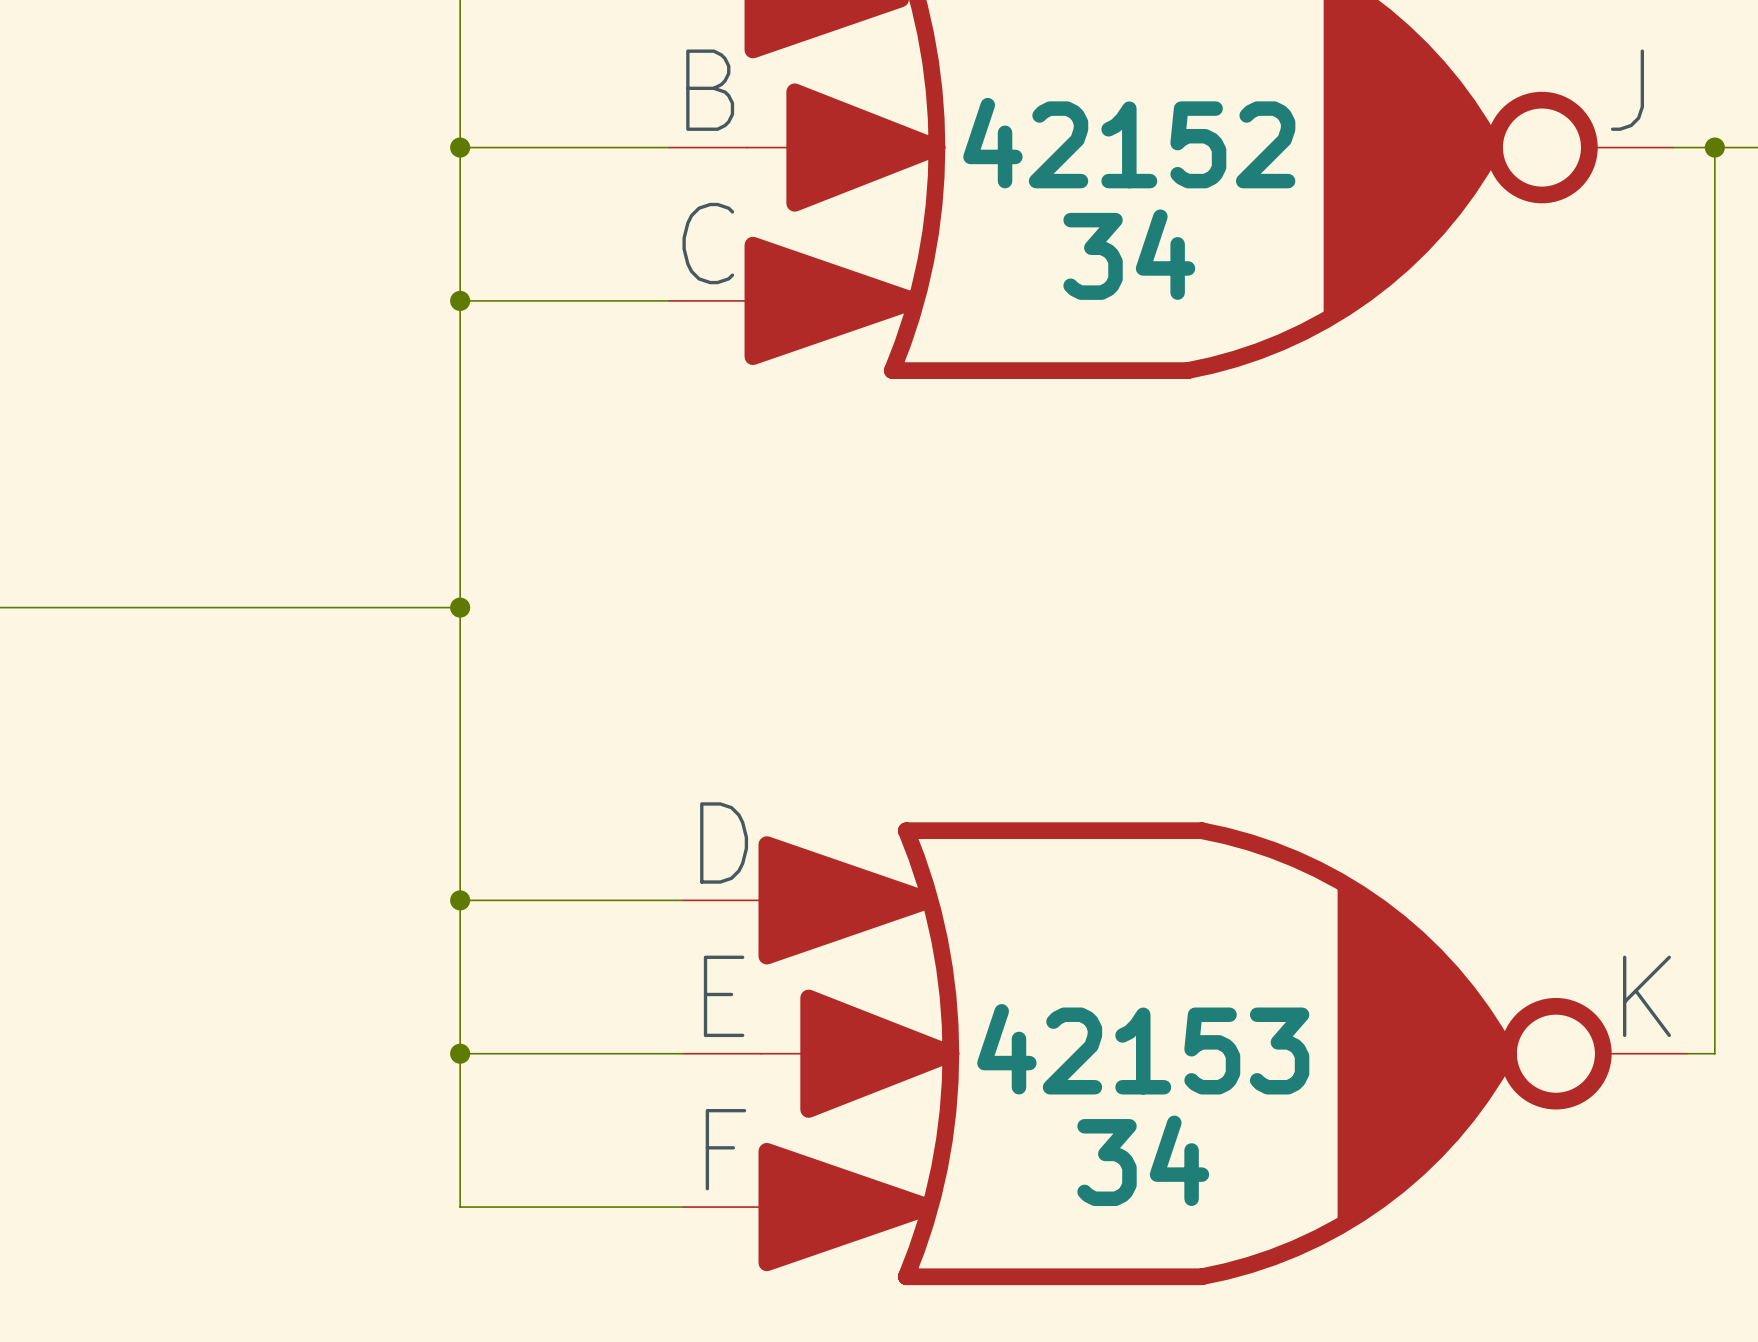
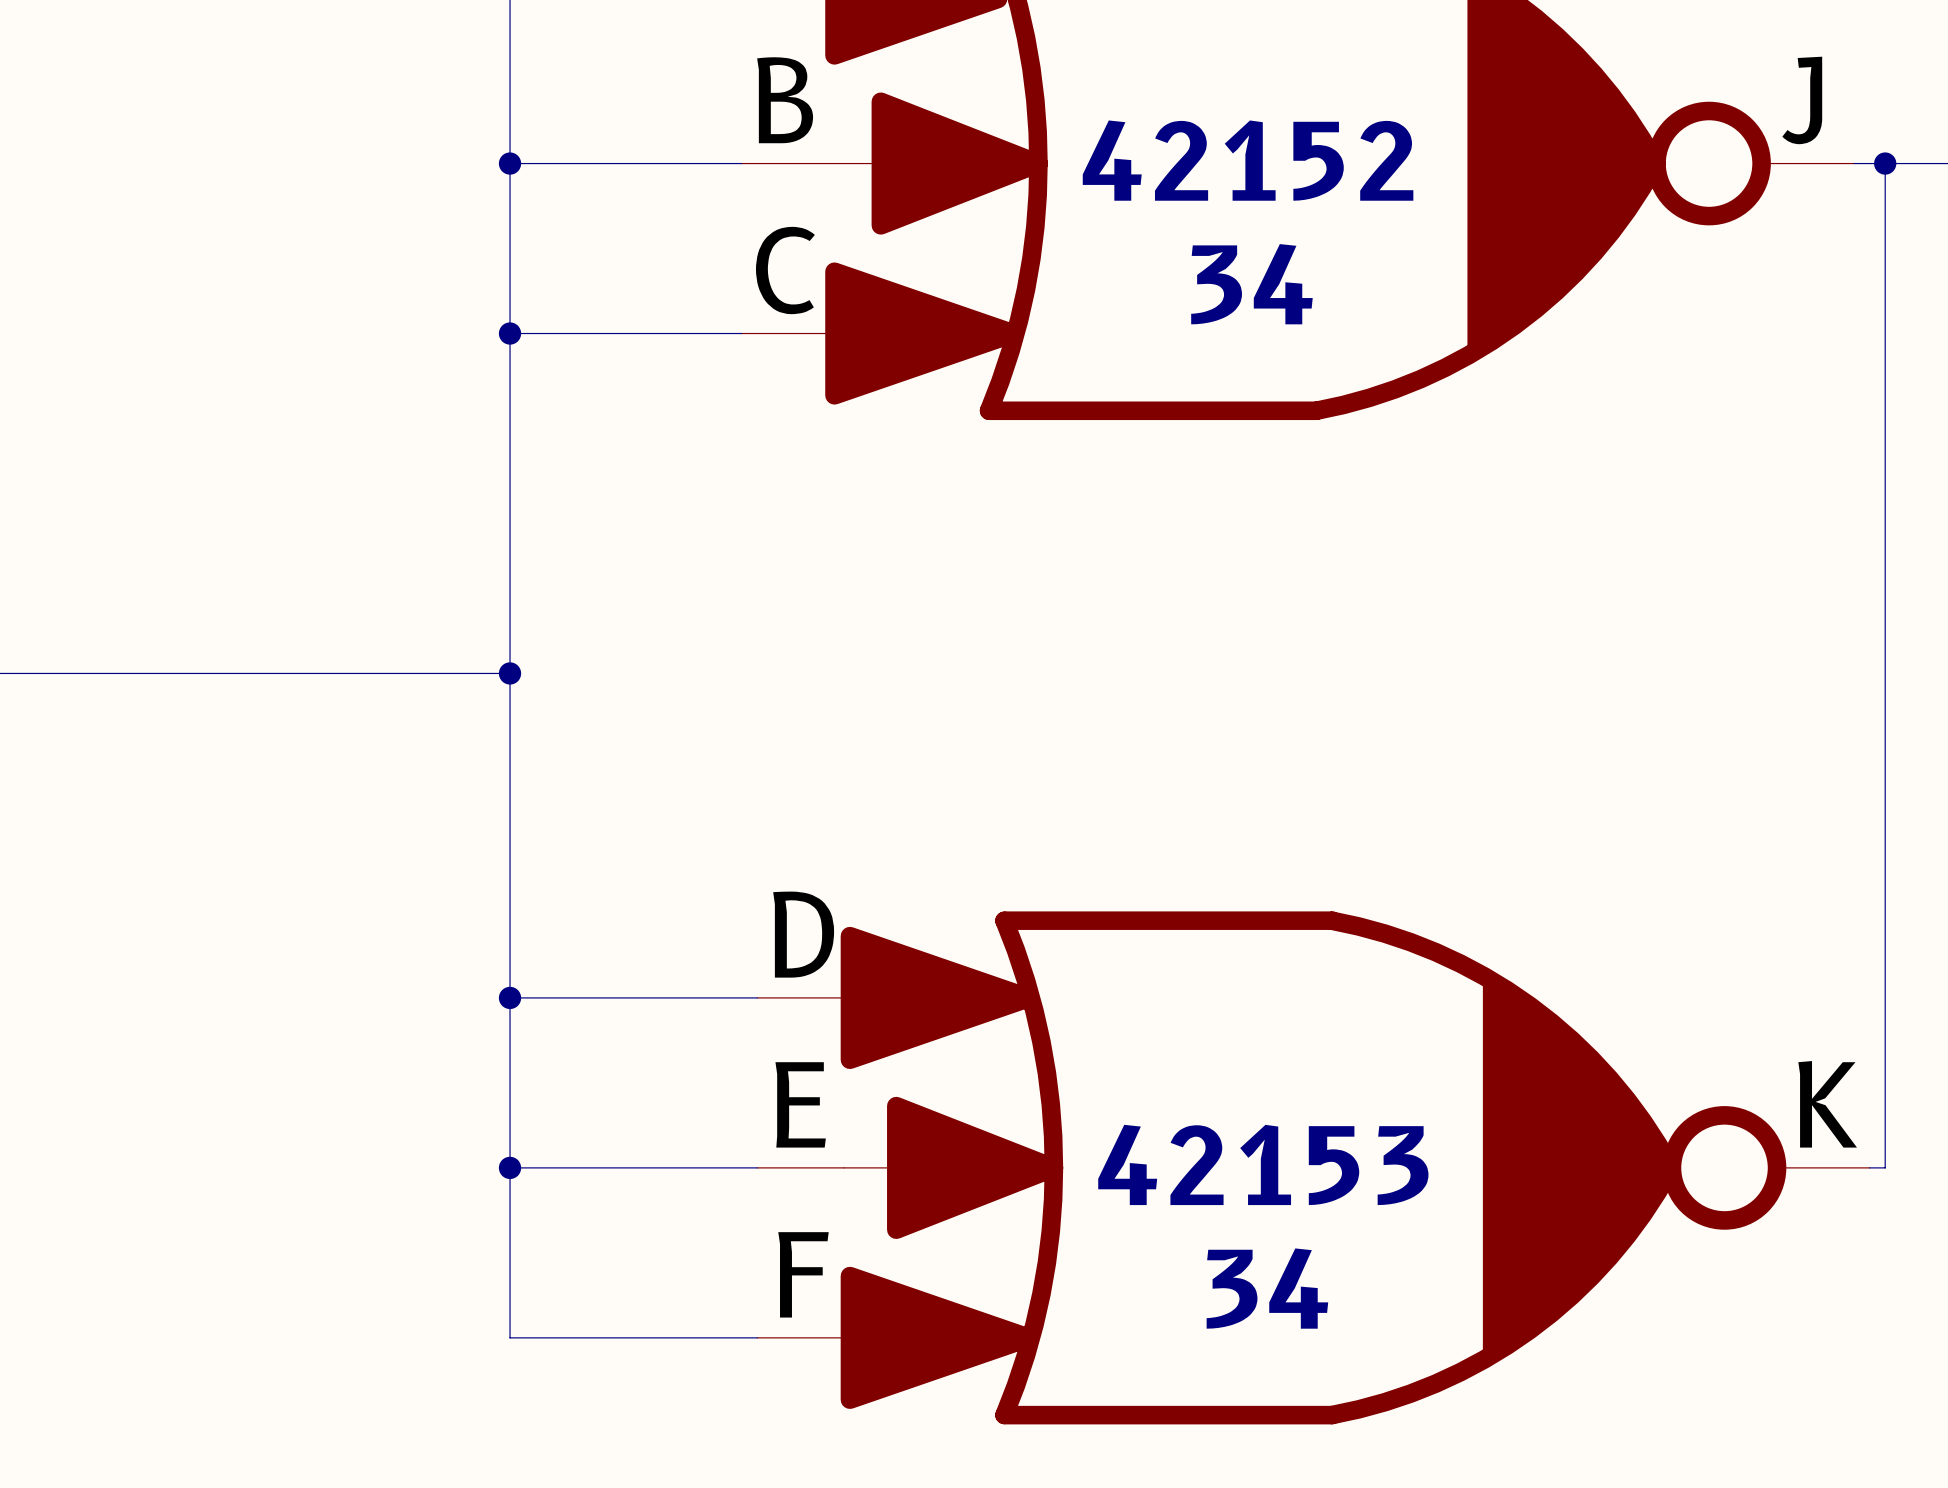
wire: (1714, 147) (1714, 1053) (1700, 1053) -> (1885, 163) (1885, 1167)
junction position: (1714, 147) -> (1885, 163)

